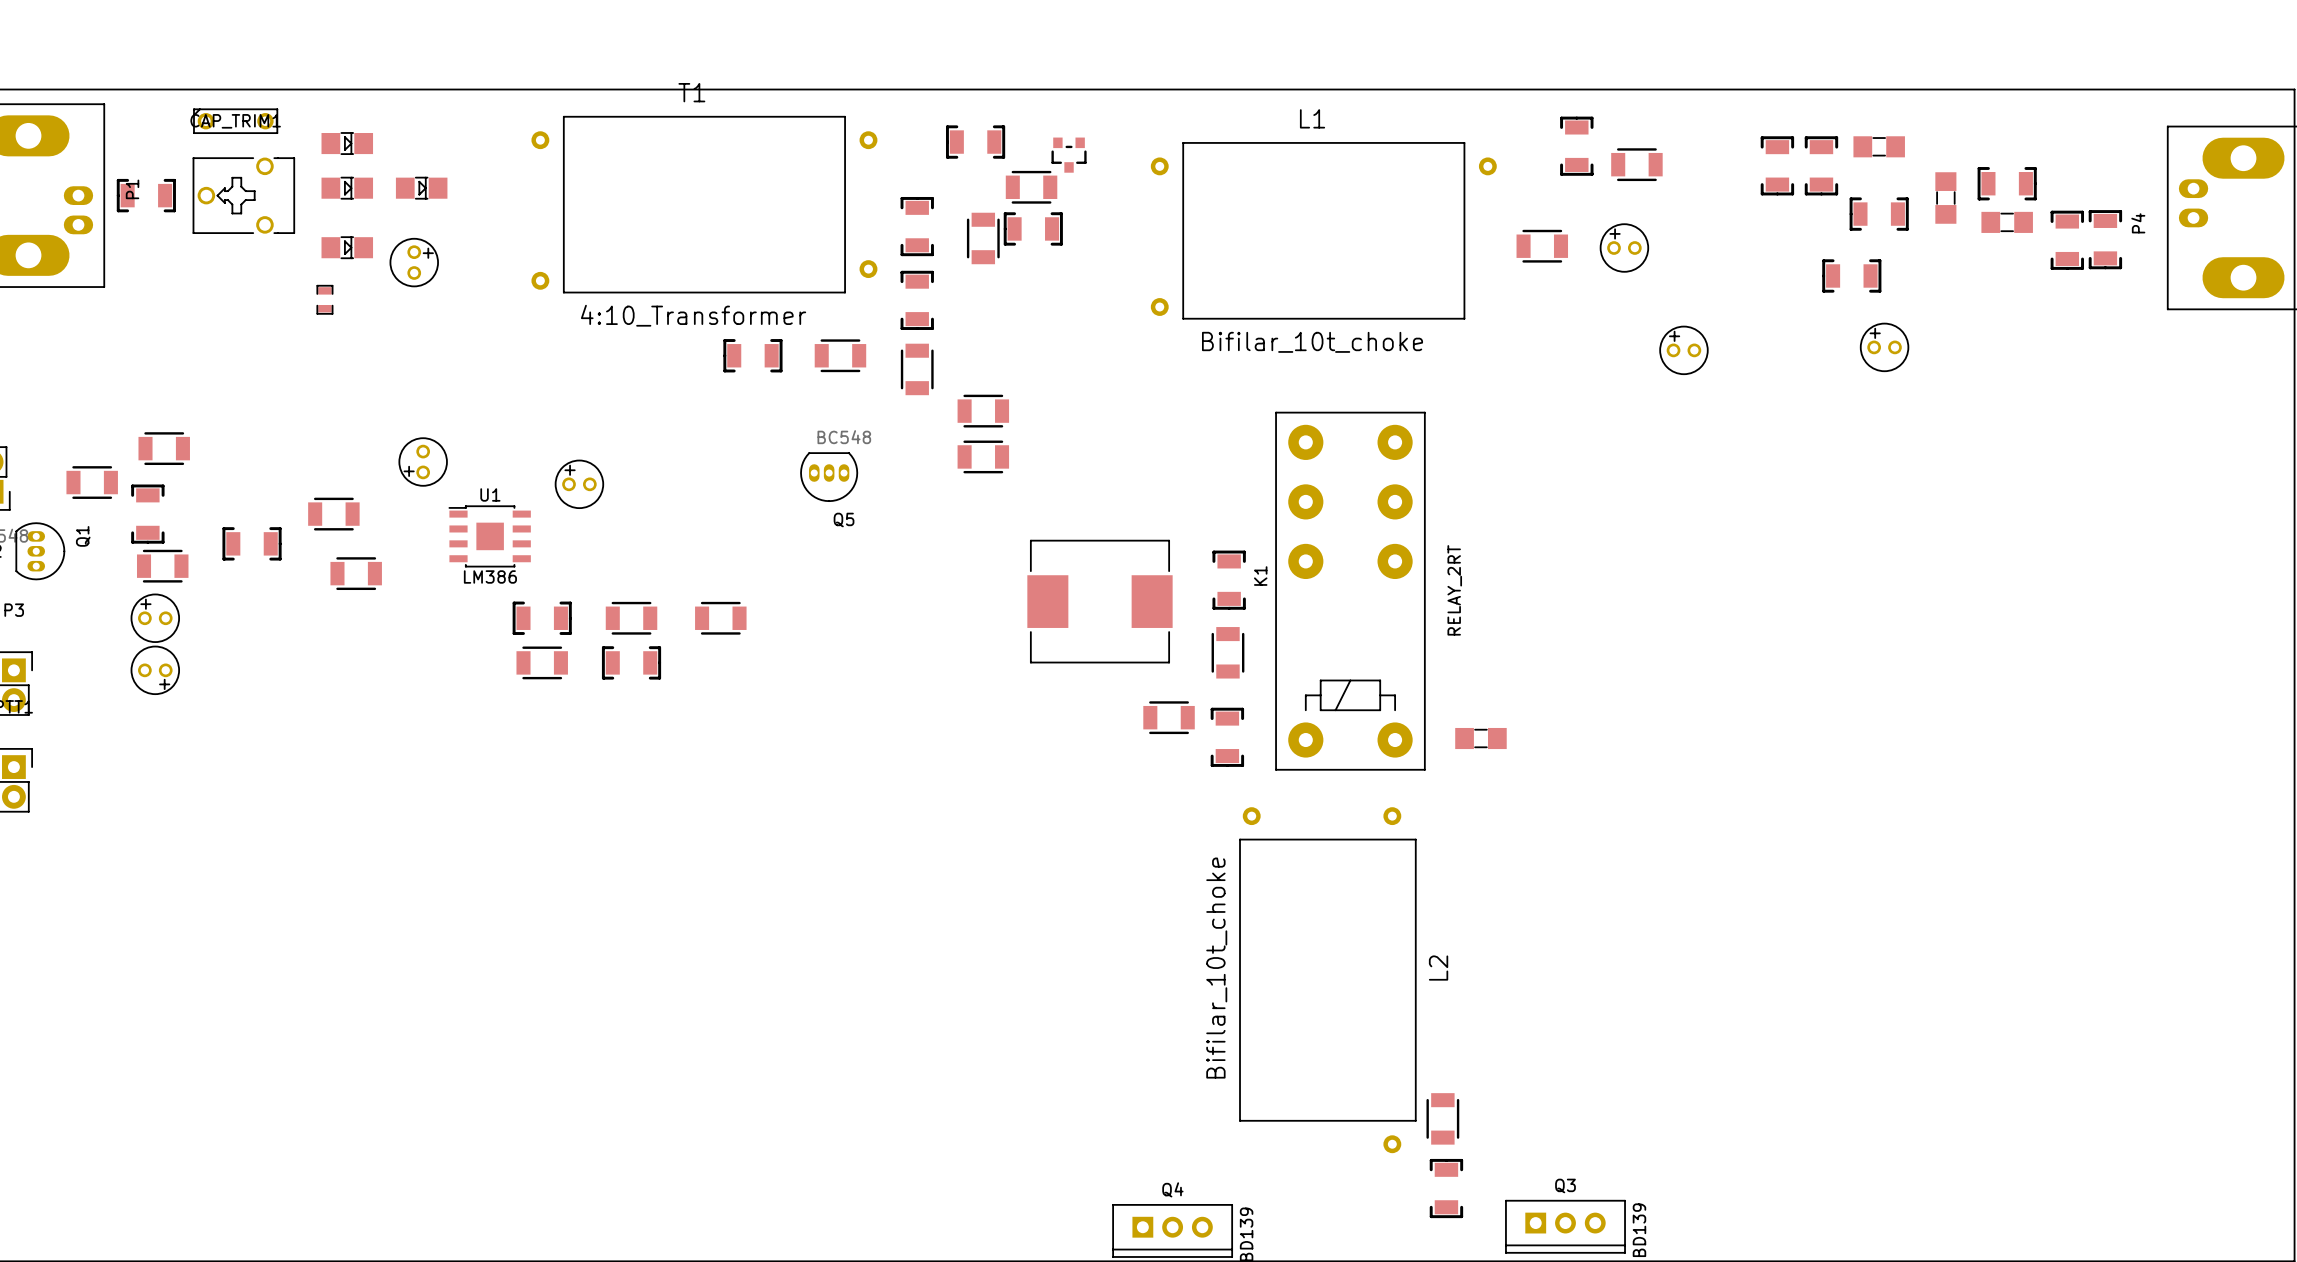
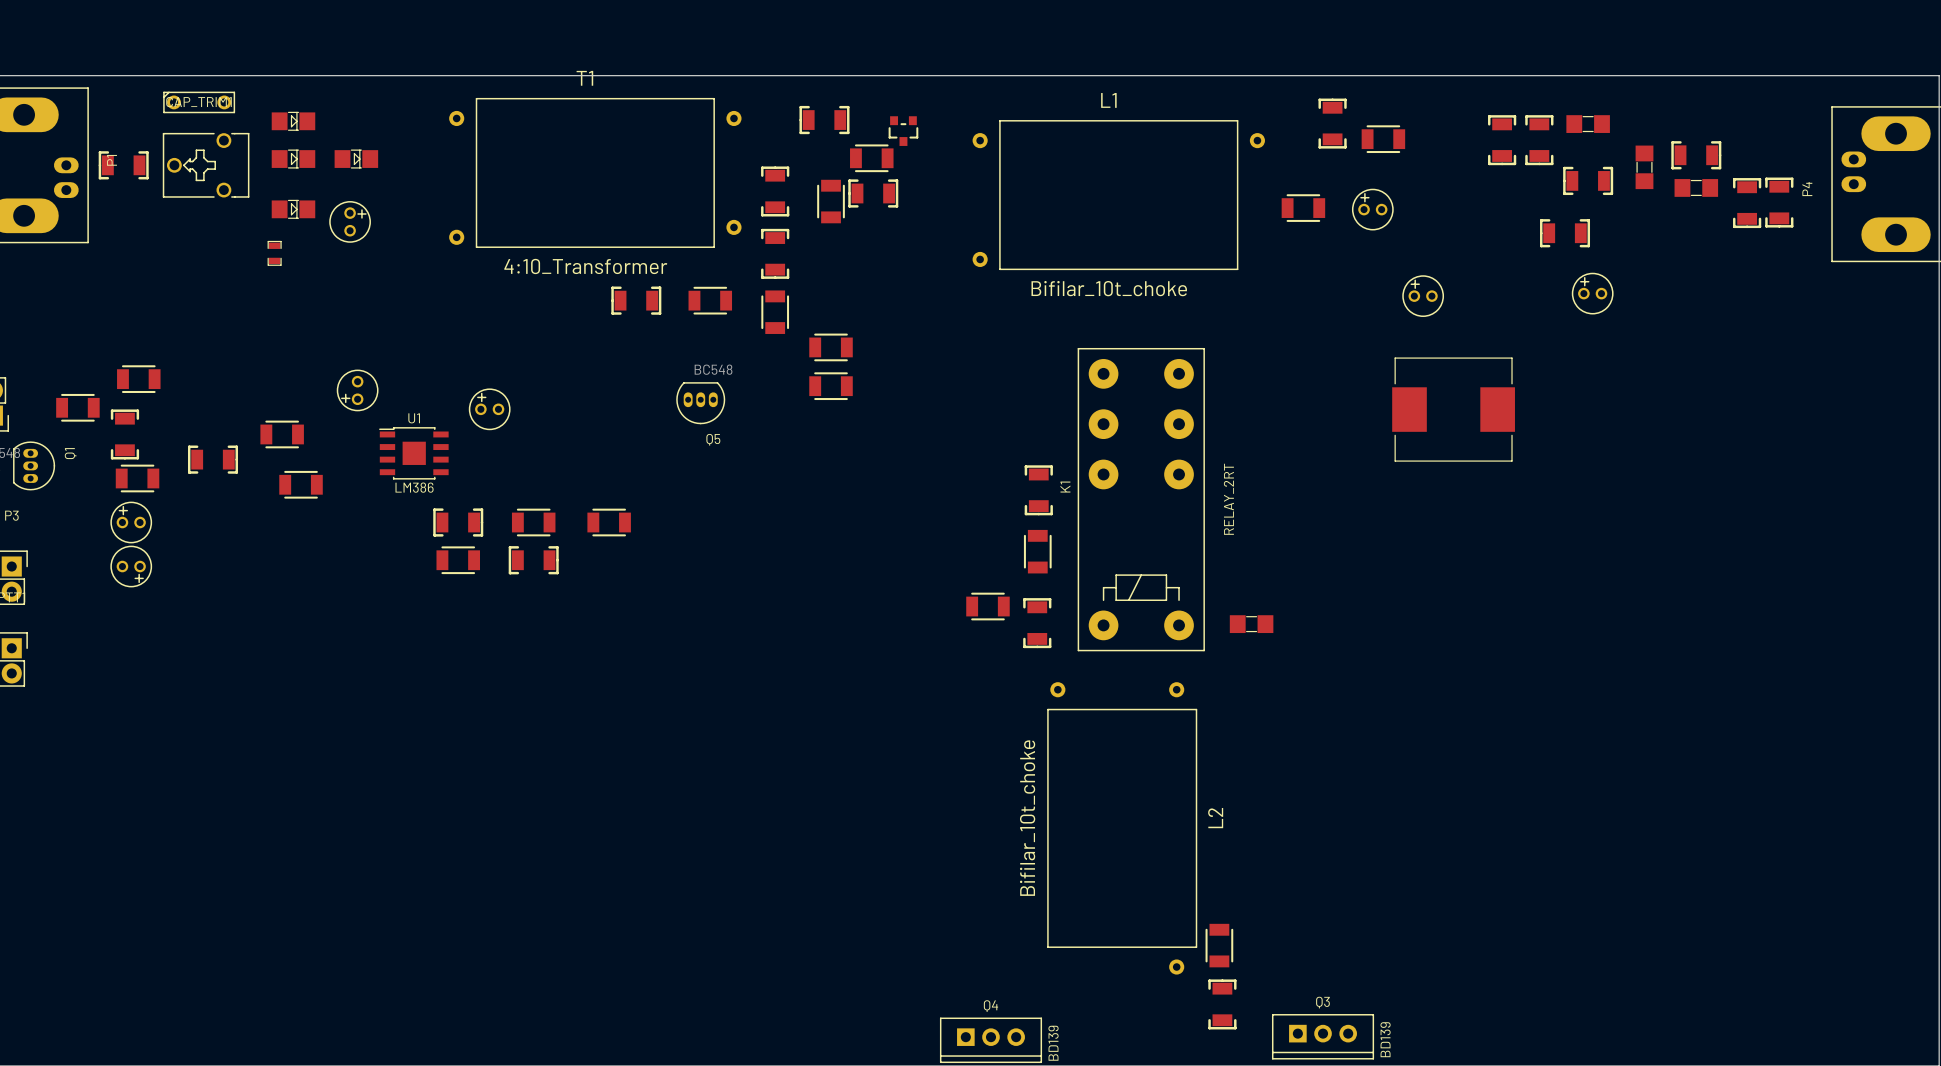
part: none -> (1453, 409)
part: (1099, 601) -> none

